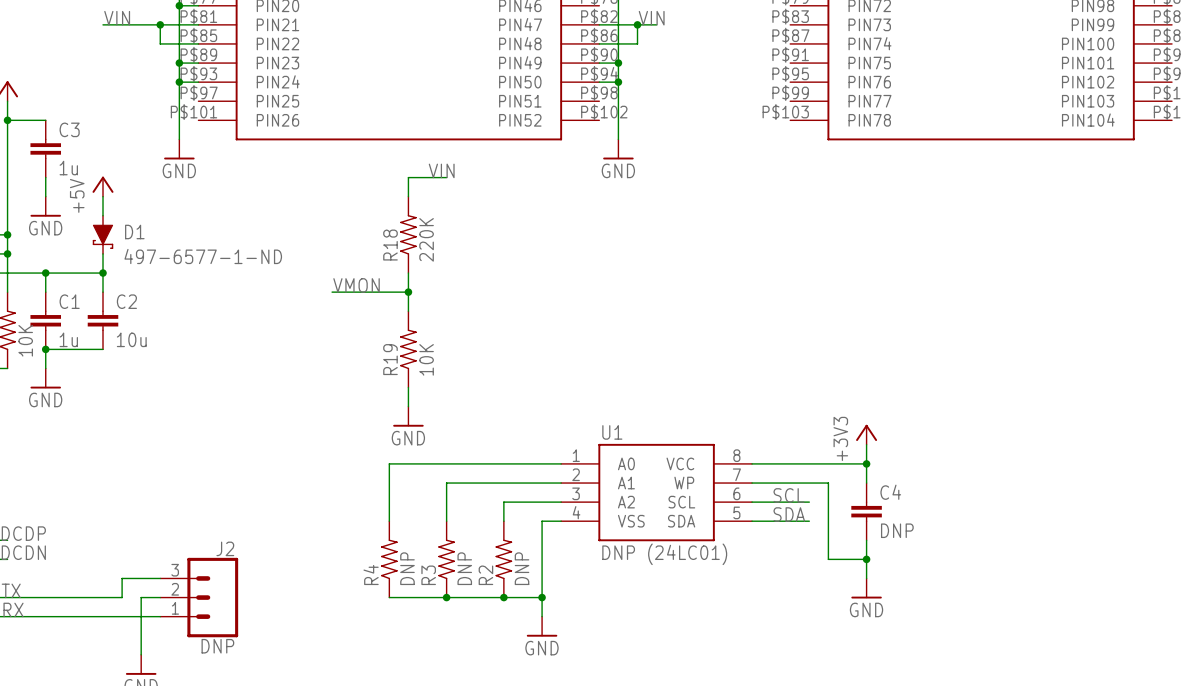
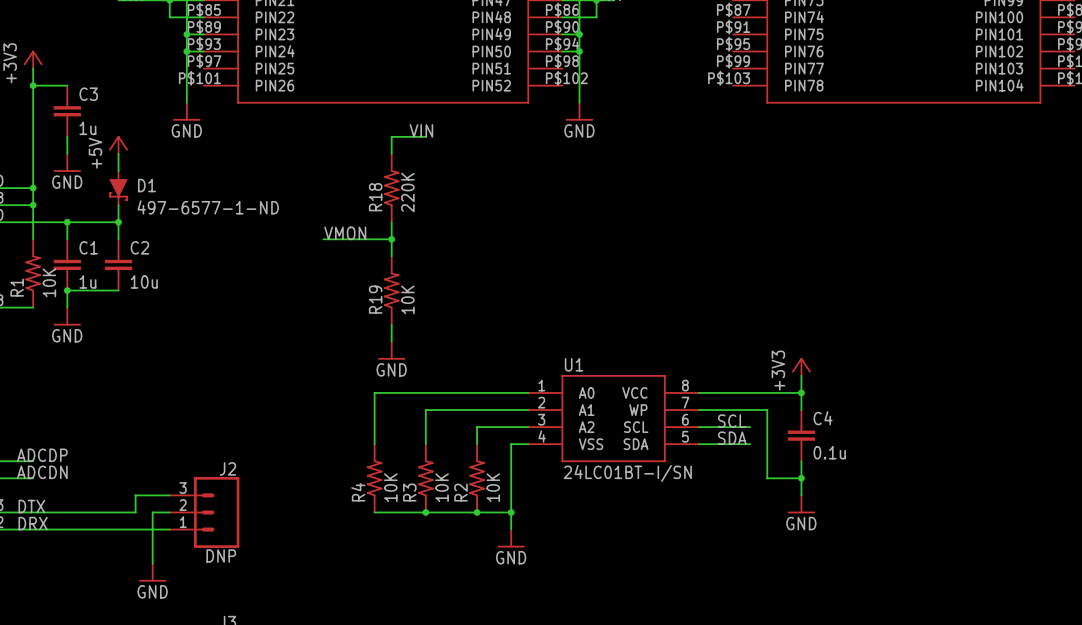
C4 value: DNP (897, 530) -> 0.1u (829, 452)
U1 value: DNP (24LC01) (664, 554) -> 24LC01BT-I/SN (627, 473)
R4 value: DNP (407, 568) -> 10K (390, 487)
R3 value: DNP (464, 568) -> 10K (442, 487)
R2 value: DNP (522, 568) -> 10K (493, 487)

